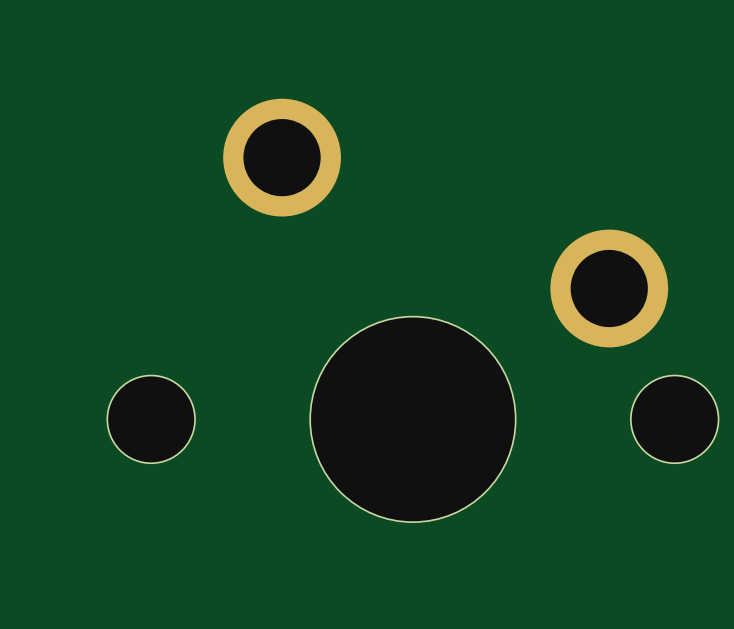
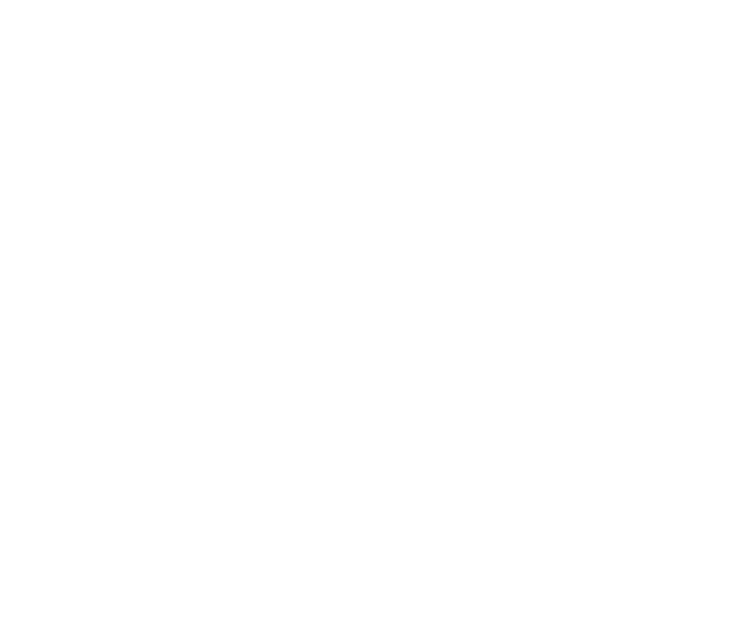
part: (412, 310) -> none

